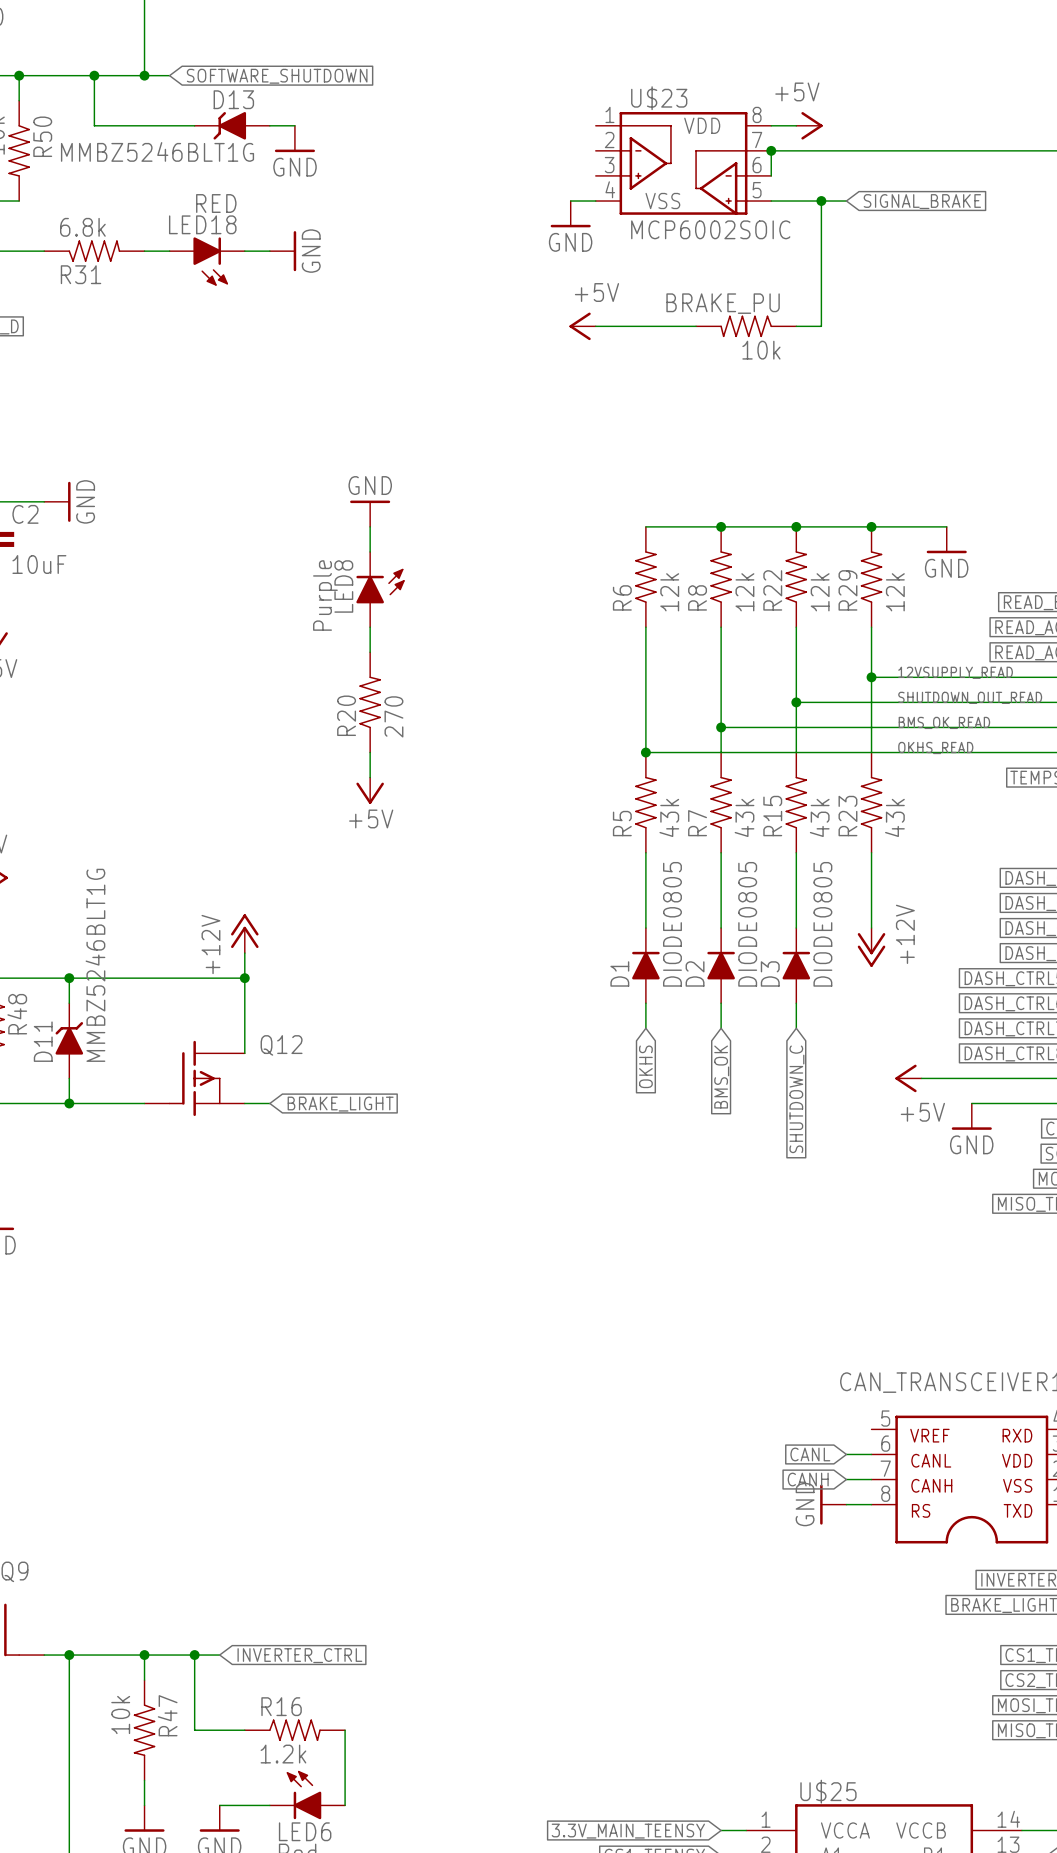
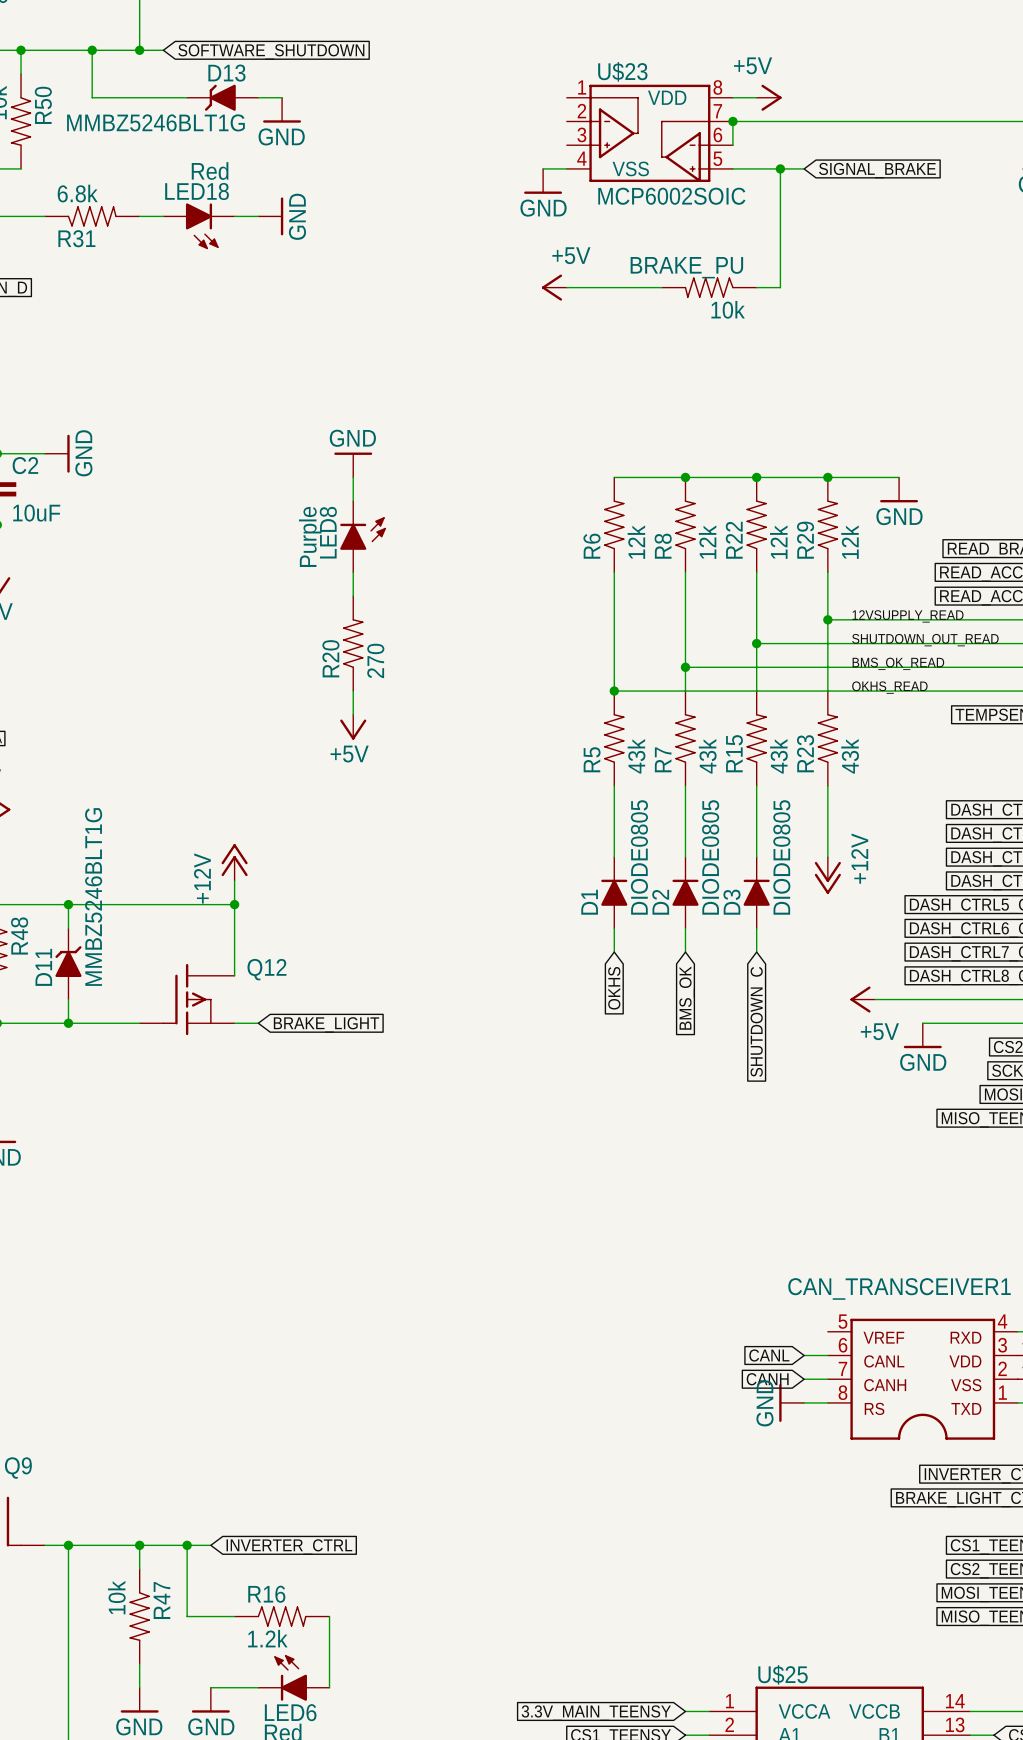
LED18 value: RED (216, 203) -> Red (210, 171)

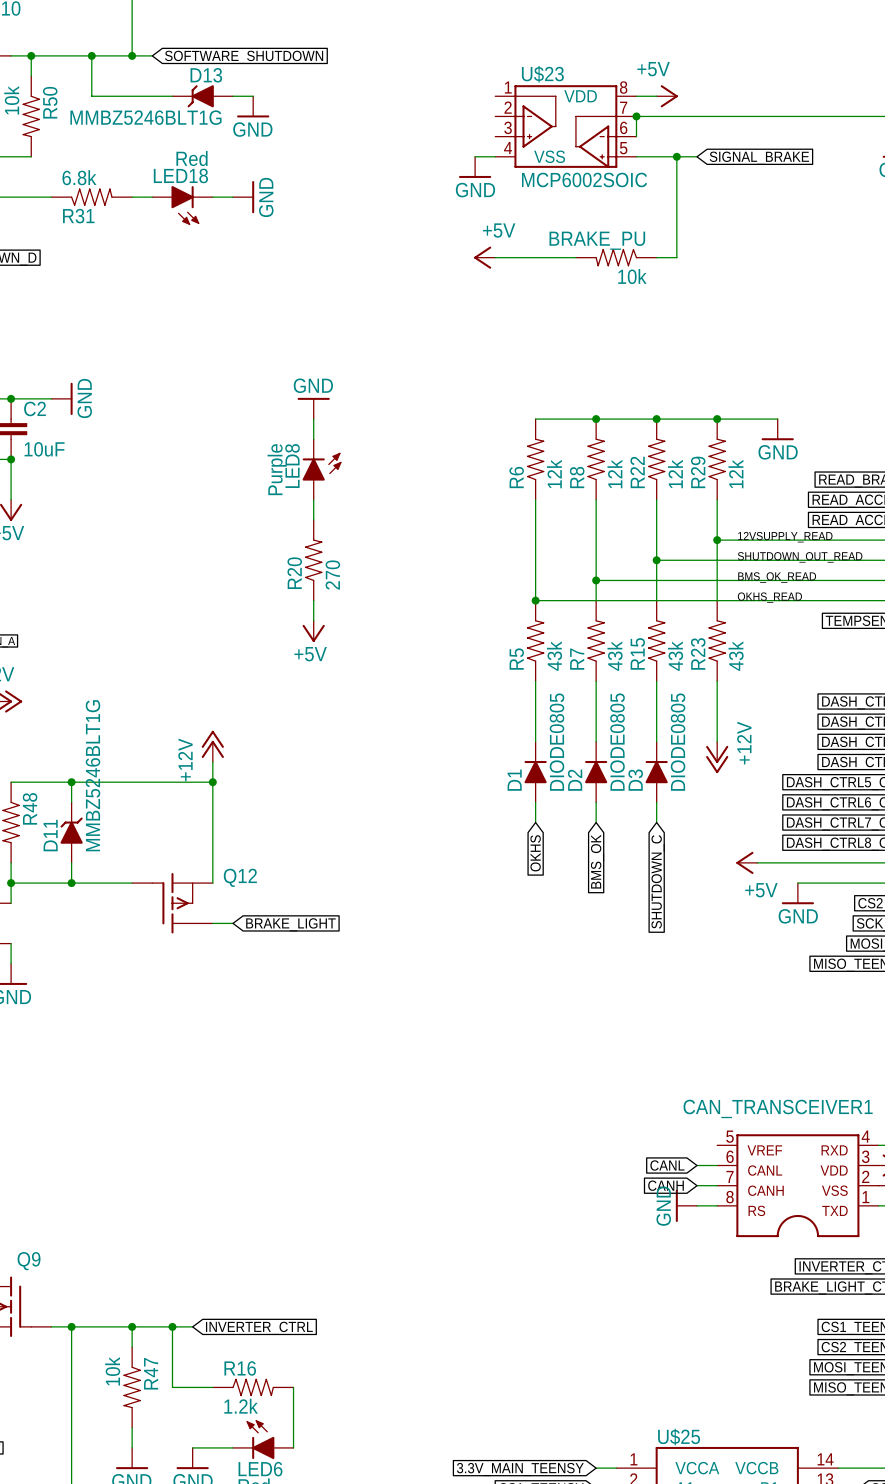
Q12 flip: as is (187, 999) -> up-down (172, 903)
wire: (234, 1023) (258, 1023) -> (212, 883) (212, 842)
global label position: BRAKE_LIGHT (326, 1024) -> BRAKE_LIGHT (290, 924)
wire: none -> (212, 923) (233, 923)

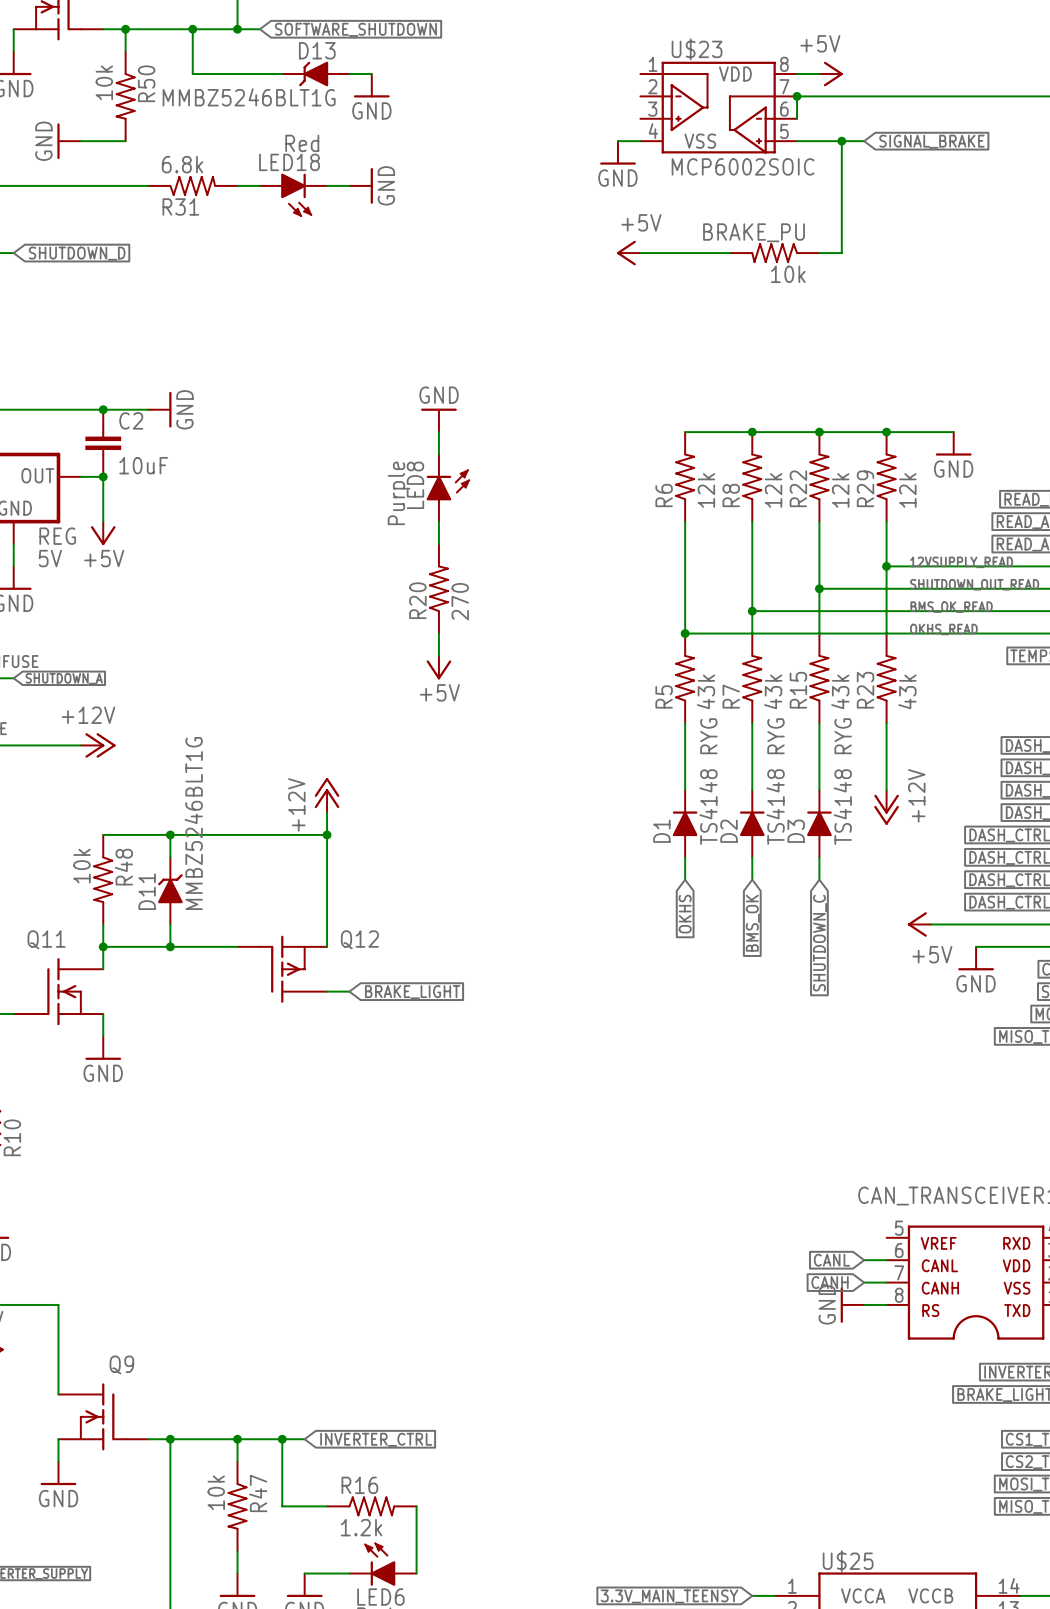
D1 value: DIODE0805 (557, 742) -> TS4148 RYG (708, 781)
D2 value: DIODE0805 (617, 742) -> TS4148 RYG (775, 781)
D3 value: DIODE0805 (678, 742) -> TS4148 RYG (842, 781)

